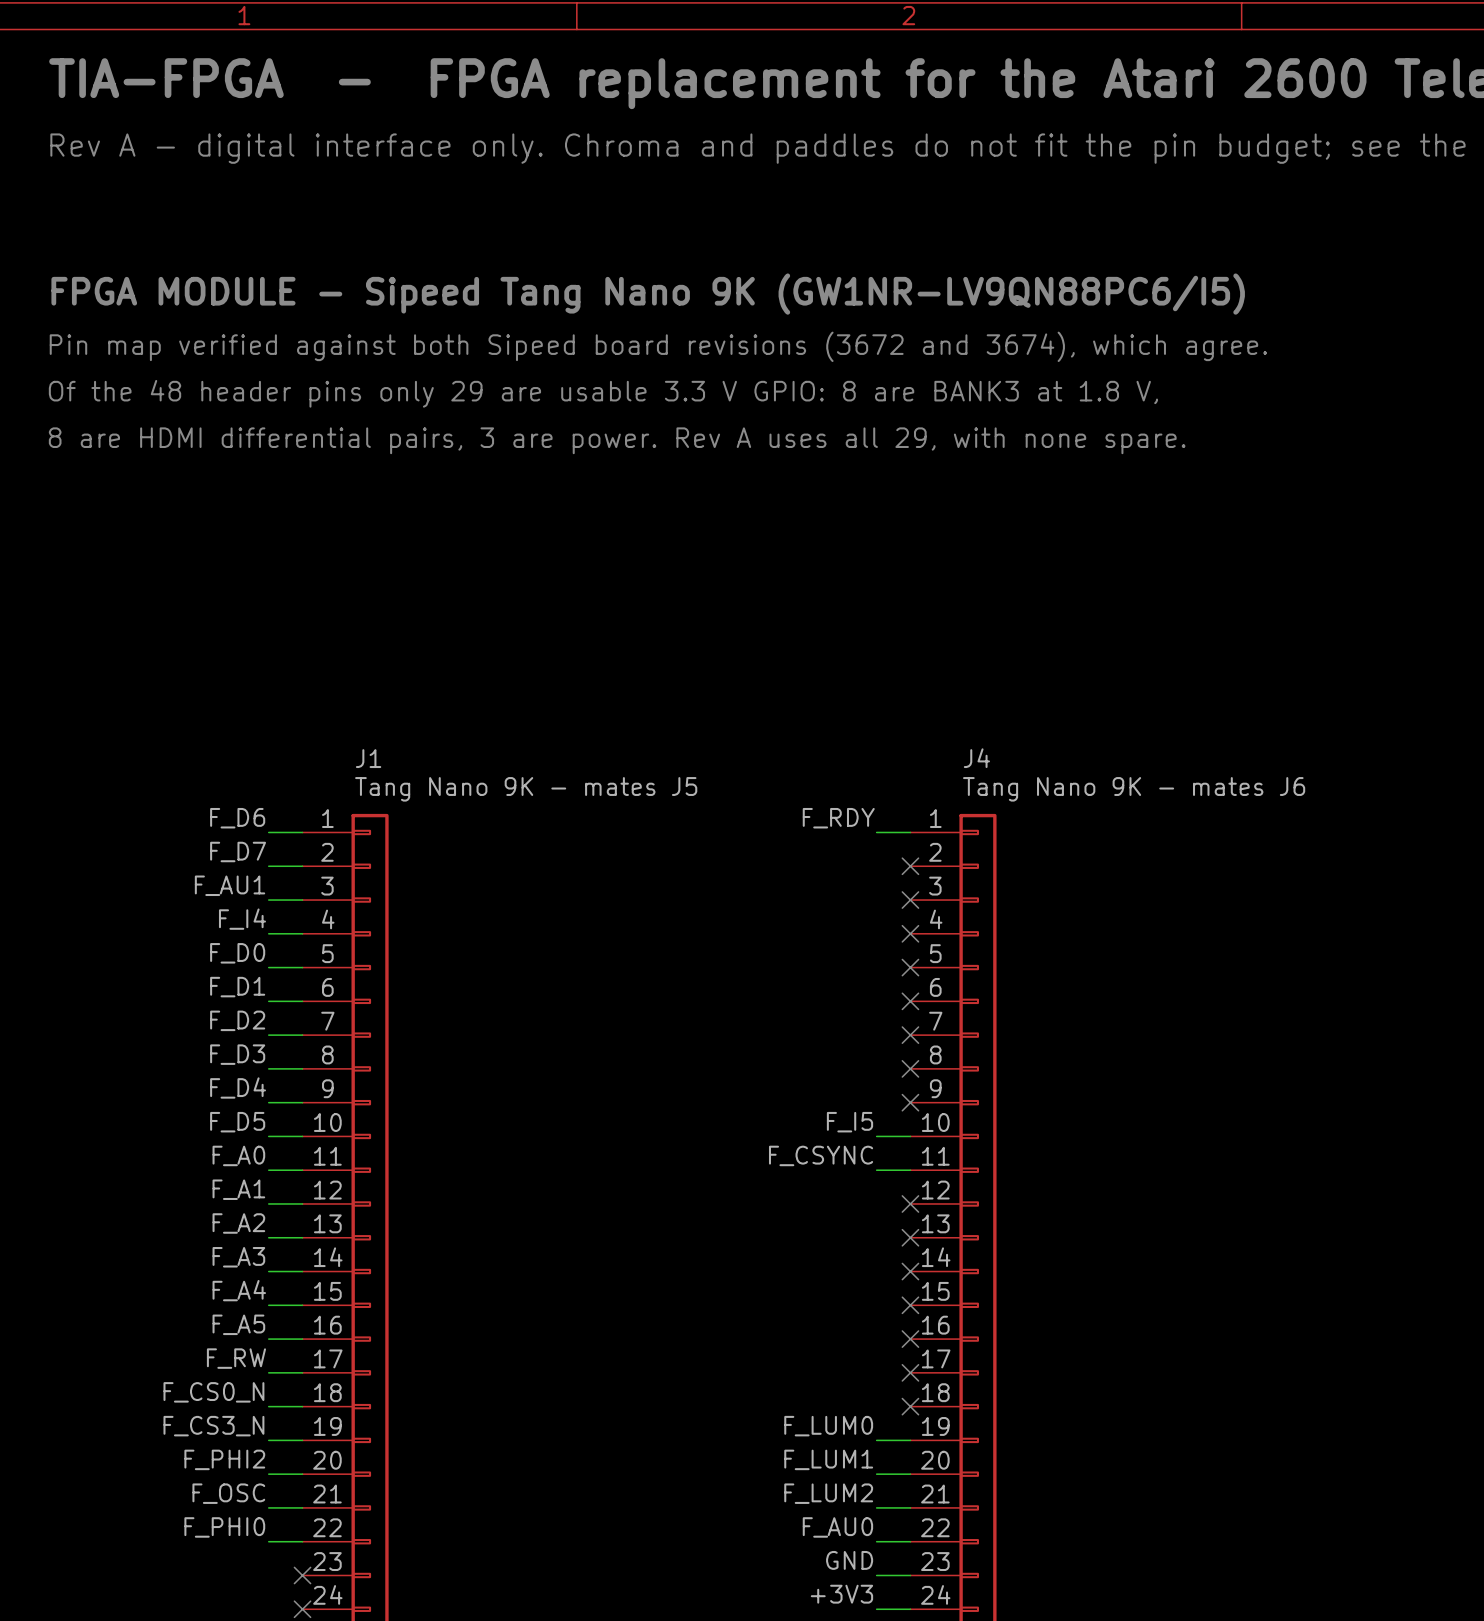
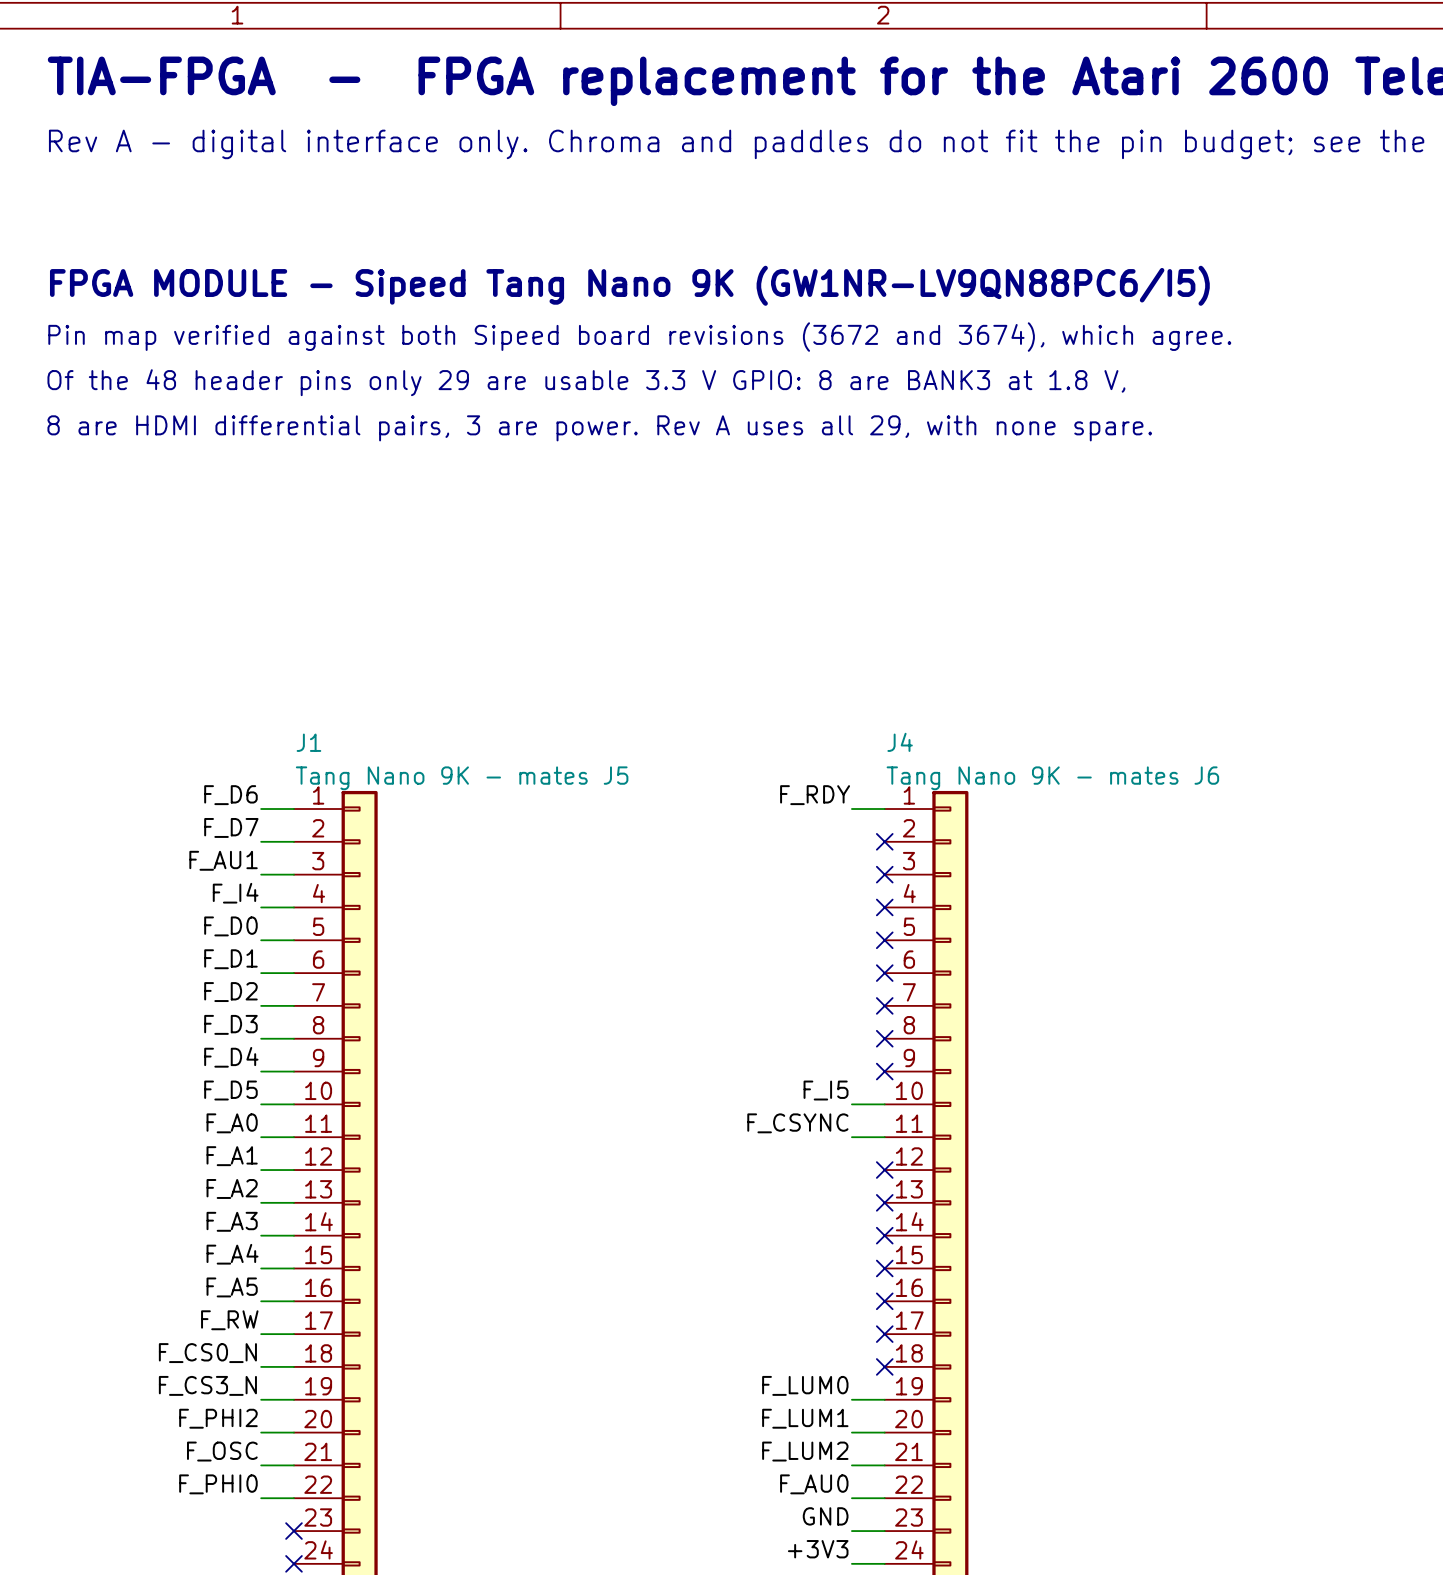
J1 name position: J1 (368, 758) -> J1 (308, 742)
J4 name position: J4 (976, 758) -> J4 (900, 742)
J1 value position: Tang Nano 9K - mates J5 (526, 789) -> Tang Nano 9K - mates J5 (462, 778)
J4 value position: Tang Nano 9K - mates J6 (1134, 789) -> Tang Nano 9K - mates J6 (1052, 778)

